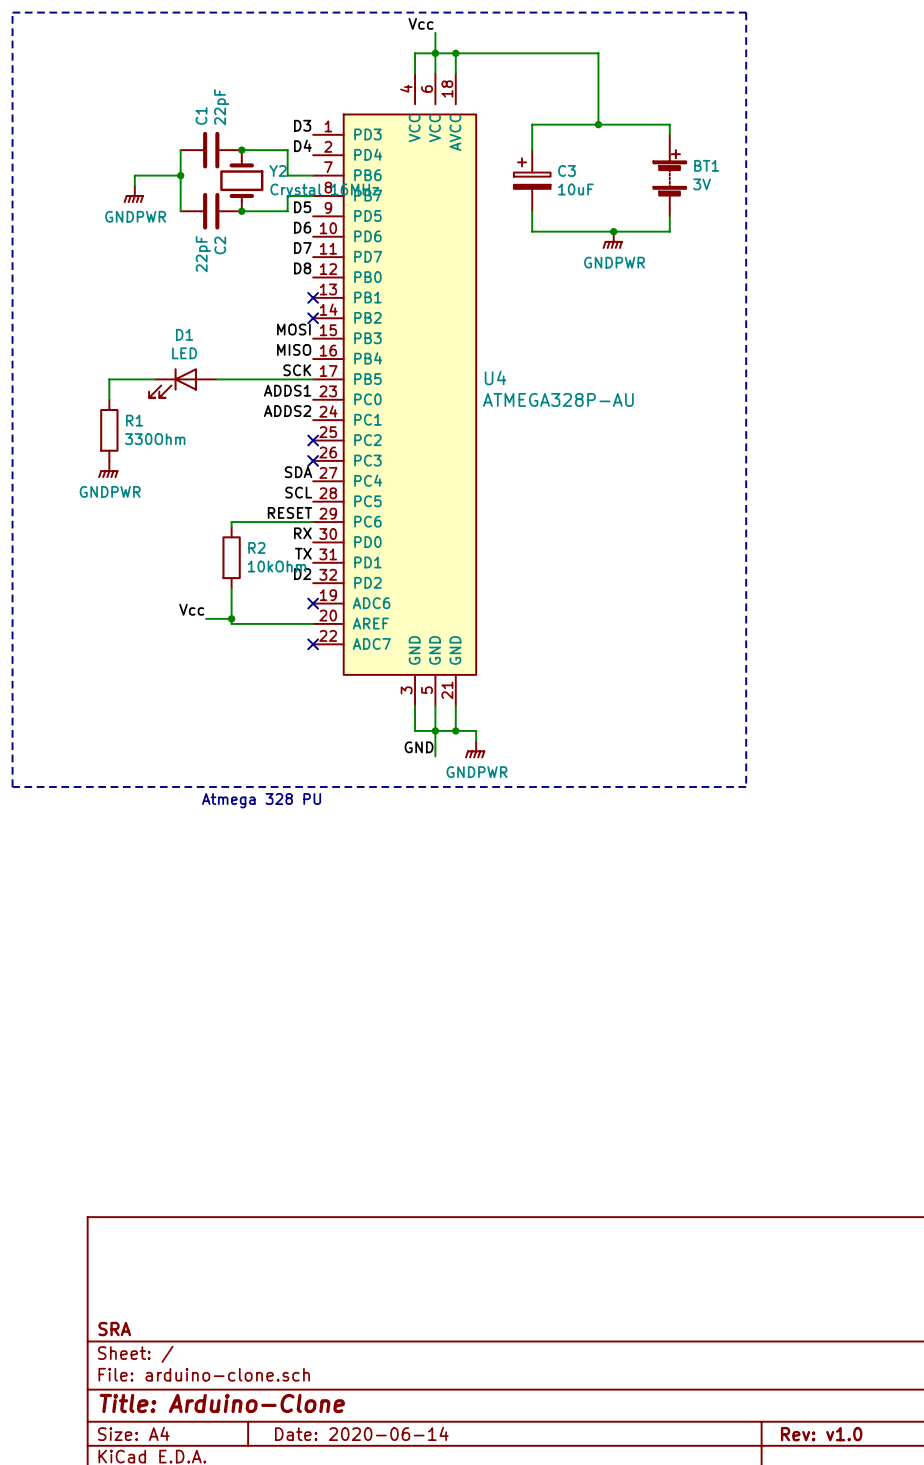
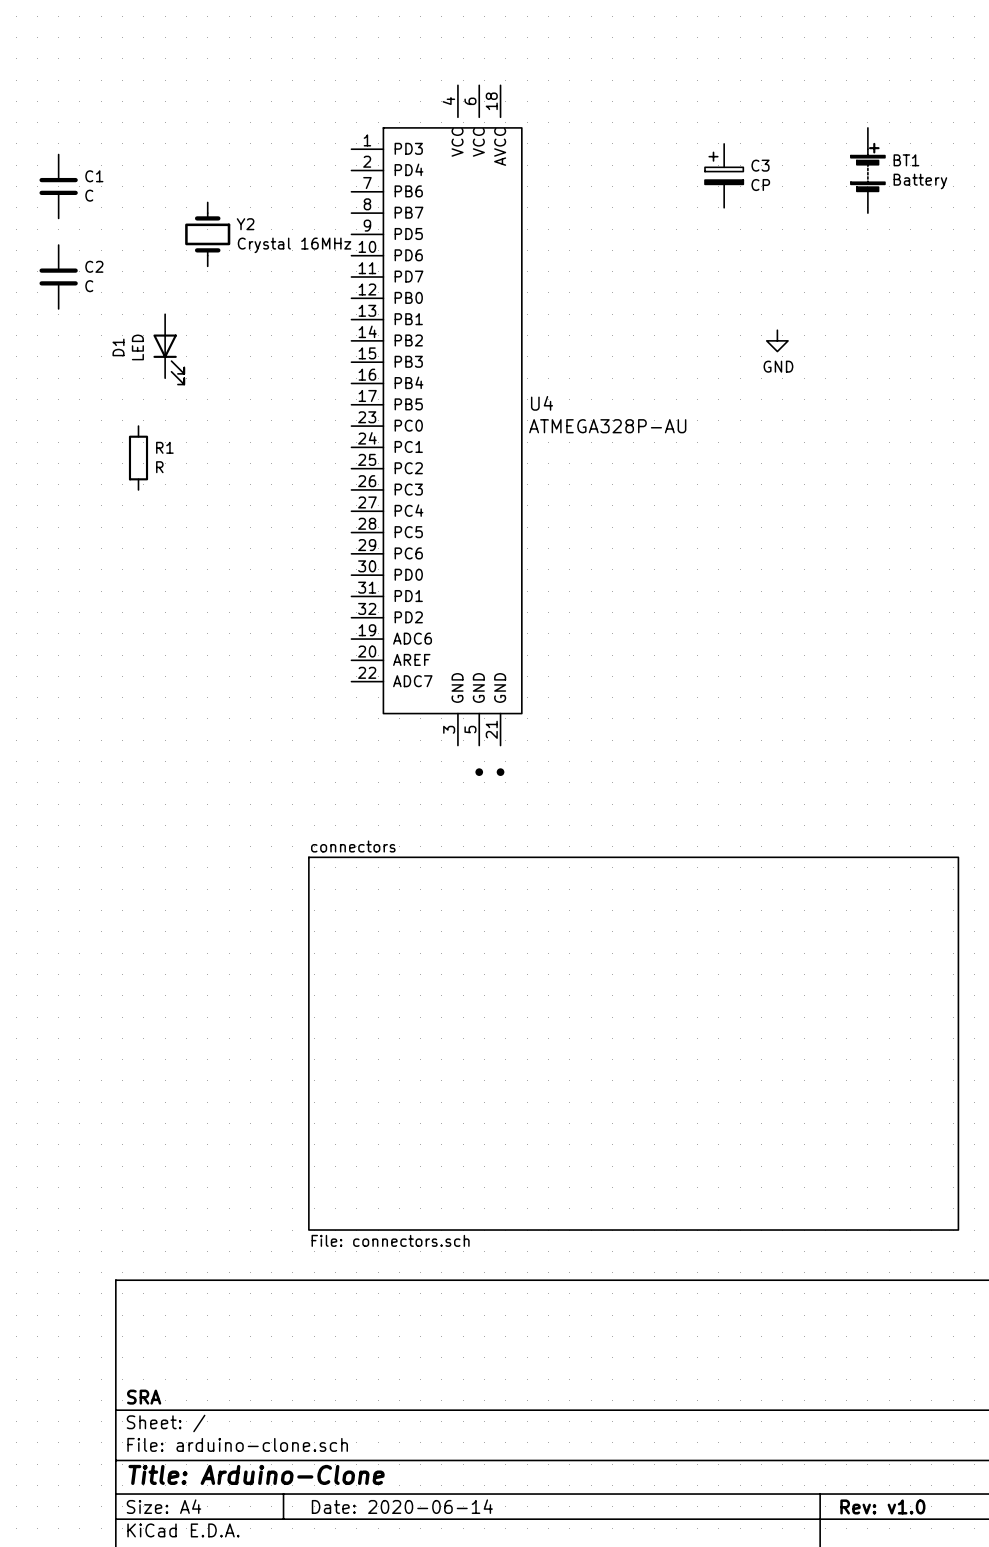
line: (12, 12) (12, 786) (746, 786) (746, 12) (12, 12) -> none
label: Vcc (421, 23) -> none
wire: (435, 32) (435, 73) -> none
junction: (435, 53) -> none
wire: (455, 53) (455, 73) -> none
junction: (455, 53) -> none
wire: (415, 73) (415, 53) (598, 53) (598, 124) -> none
C1 value: 22pF (221, 107) -> C (89, 195)
junction: (598, 124) -> none
label: D3 (302, 125) -> none
wire: (669, 134) (669, 124) (532, 124) (532, 150) -> none
label: D4 (302, 145) -> none
wire: (180, 150) (180, 211) -> none
C1 rotation: 0° (211, 150) -> 90° clockwise (58, 186)
C1 position: (211, 150) -> (58, 186)
wire: (241, 150) (287, 150) (287, 175) (313, 175) -> none
junction: (241, 150) -> none
wire: (180, 175) (134, 175) (134, 185) -> none
junction: (180, 175) -> none
BT1 position: (669, 175) -> (867, 170)
Y2 position: (241, 180) -> (207, 234)
C3 position: (532, 180) -> (724, 175)
BT1 value: 3V (702, 184) -> Battery (920, 181)
C3 value: 10uF (575, 189) -> CP (760, 185)
power symbol: GNDPWR (133, 194) -> none
wire: (313, 195) (287, 195) (287, 211) (241, 211) -> none
label: D5 (302, 207) -> none
C2 rotation: 0° (211, 211) -> 90° clockwise (58, 276)
C2 position: (211, 211) -> (58, 276)
junction: (241, 211) -> none
wire: (532, 211) (532, 231) (669, 231) (669, 216) -> none
label: D6 (302, 227) -> none
junction: (613, 231) -> none
power symbol: GNDPWR (612, 240) -> none
C2 name position: C2 (220, 245) -> C2 (94, 266)
label: D7 (302, 248) -> none
C2 value: 22pF (203, 254) -> C (89, 286)
label: D8 (302, 268) -> none
no-connect mark: (313, 297) -> none
no-connect mark: (313, 318) -> none
power symbol: none -> GND (777, 340)
label: MOSI (293, 329) -> none
label: MISO (294, 349) -> none
label: SCK (297, 370) -> none
wire: (155, 379) (109, 379) (109, 399) -> none
wire: (216, 379) (313, 379) -> none
D1 rotation: 0° (173, 382) -> 90° counterclockwise (168, 359)
D1 position: (182, 382) -> (168, 349)
label: ADDS1 (287, 390) -> none
label: ADDS2 (287, 411) -> none
R1 value: 330Ohm (155, 439) -> R (159, 467)
no-connect mark: (313, 440) -> none
no-connect mark: (313, 460) -> none
power symbol: GNDPWR (108, 469) -> none
label: SDA (298, 472) -> none
label: SCL (298, 492) -> none
label: RESET (290, 512) -> none
wire: (313, 522) (231, 522) (231, 527) -> none
label: RX (302, 533) -> none
label: TX (303, 553) -> none
R2: 10kOhm (231, 557) -> none
label: D2 (302, 574) -> none
wire: (231, 588) (231, 623) (313, 623) -> none
no-connect mark: (313, 603) -> none
label: Vcc (191, 609) -> none
wire: (206, 618) (231, 618) -> none
junction: (231, 618) -> none
no-connect mark: (313, 644) -> none
wire: (415, 705) (415, 730) (476, 730) (476, 741) -> none
wire: (435, 705) (435, 756) -> none
wire: (455, 705) (455, 730) -> none
label: GND (419, 747) -> none
power symbol: GNDPWR (475, 749) -> none
text: Atmega 328 PU (261, 800) -> none
sheet connectors: none -> File: connectors.sch (633, 1043)

